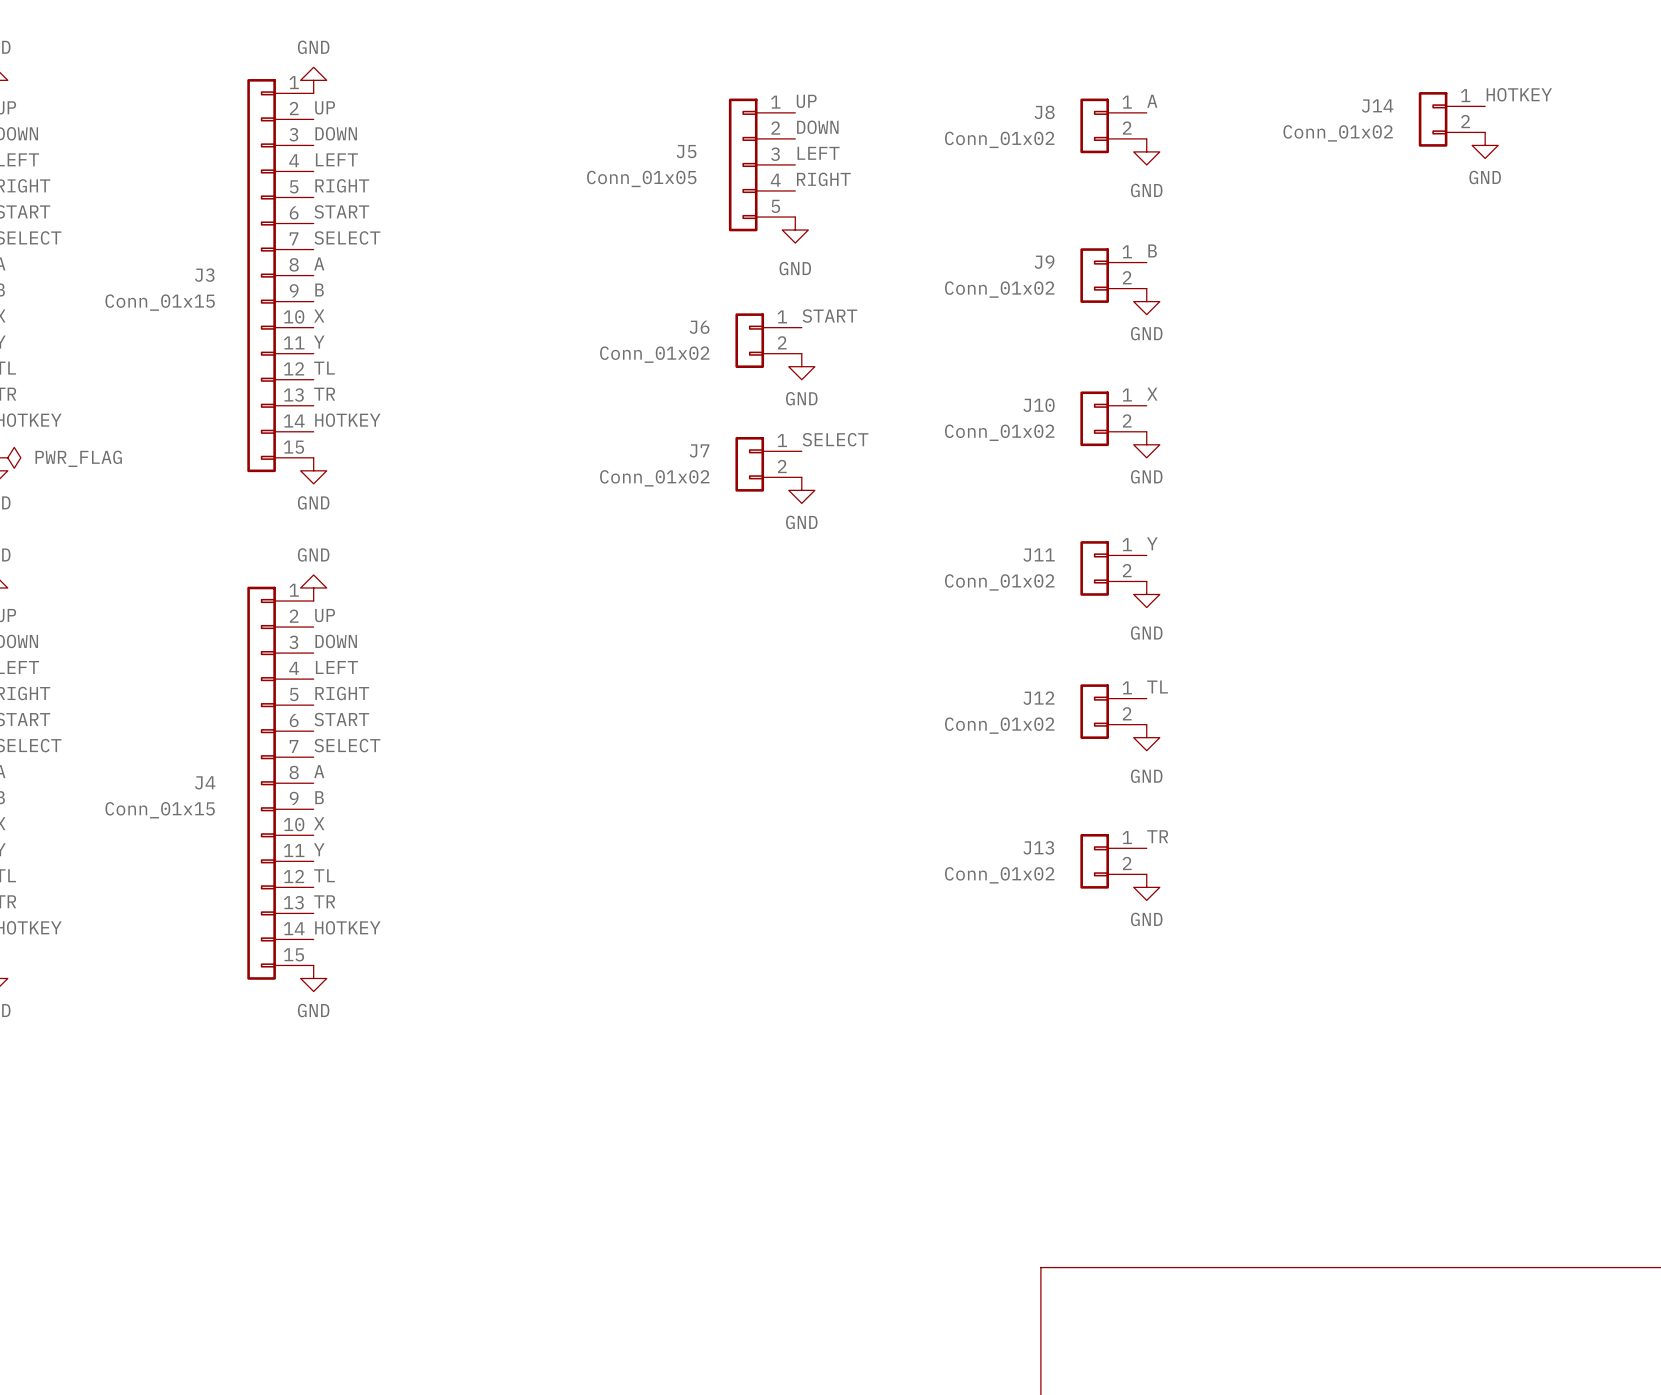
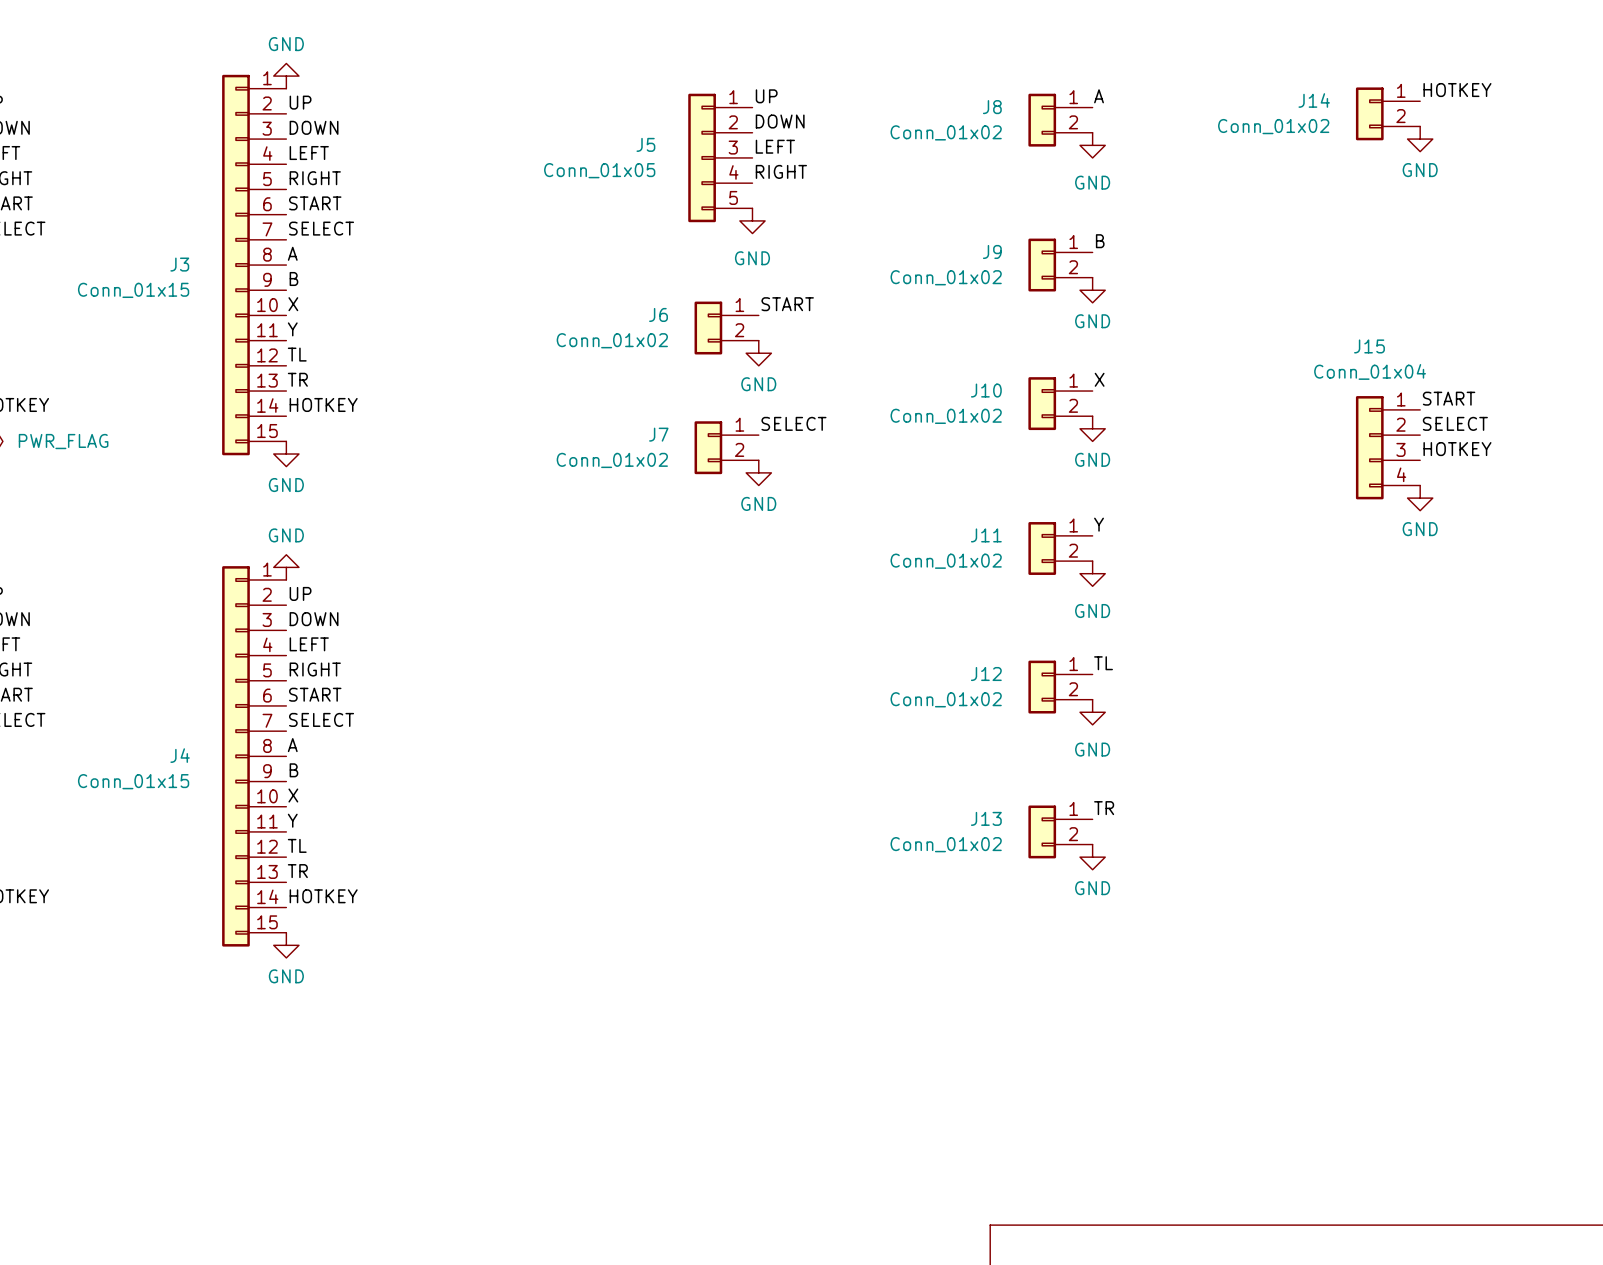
label: none -> START (1449, 398)
label: none -> SELECT (1455, 423)
J15: none -> Conn_01x04 (1388, 447)
label: none -> HOTKEY (1457, 449)
power symbol: none -> GND (1420, 498)

